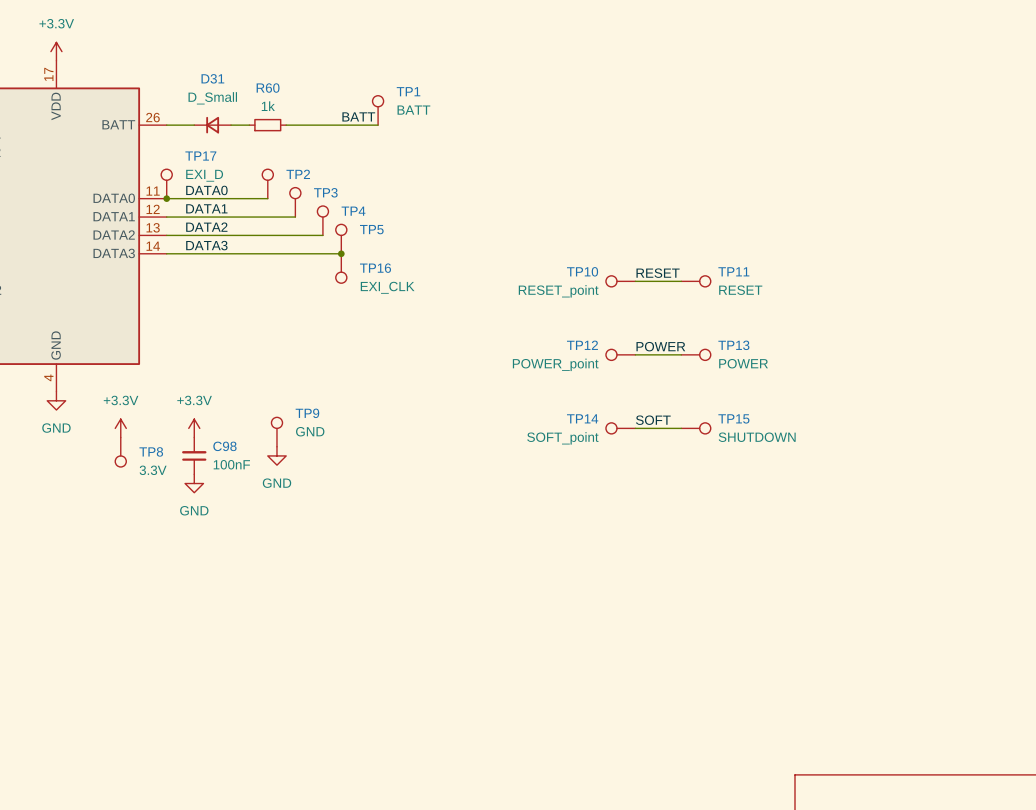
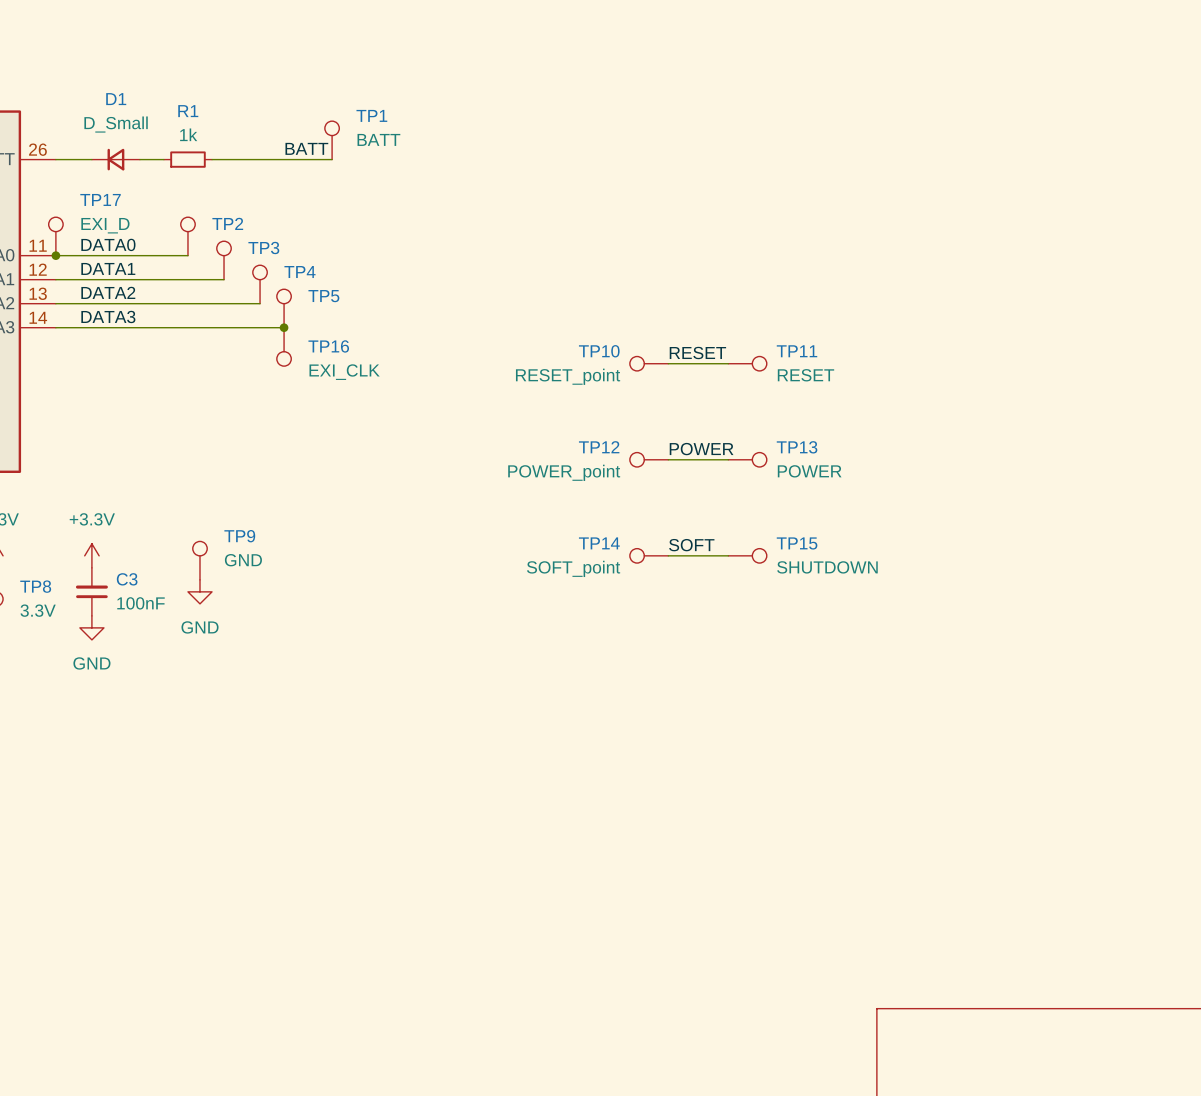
D31 name: D31 (212, 78) -> D1 (116, 99)
R60 name: R60 (268, 88) -> R1 (188, 111)
C98 name: C98 (224, 446) -> C3 (127, 579)

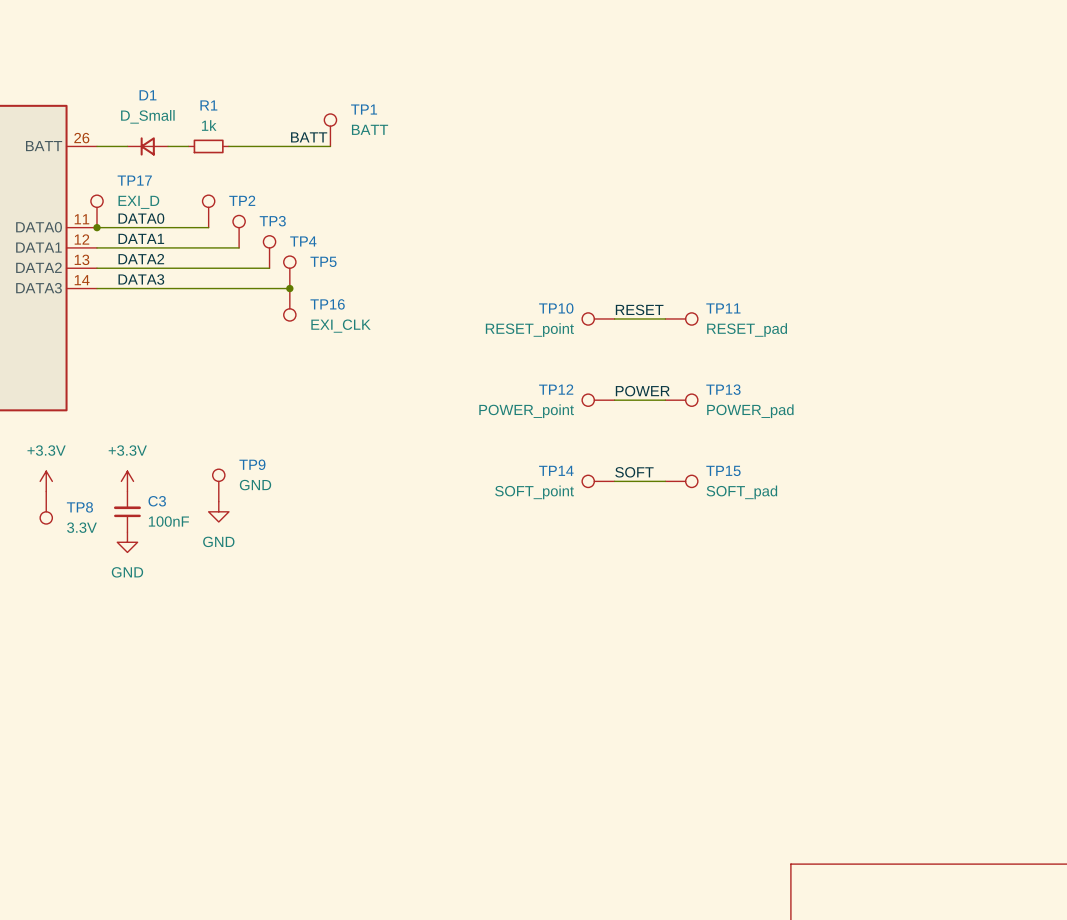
TP11 value: RESET (805, 375) -> RESET_pad (747, 330)
TP13 value: POWER (809, 471) -> POWER_pad (750, 411)
TP15 value: SHUTDOWN (827, 567) -> SOFT_pad (741, 492)

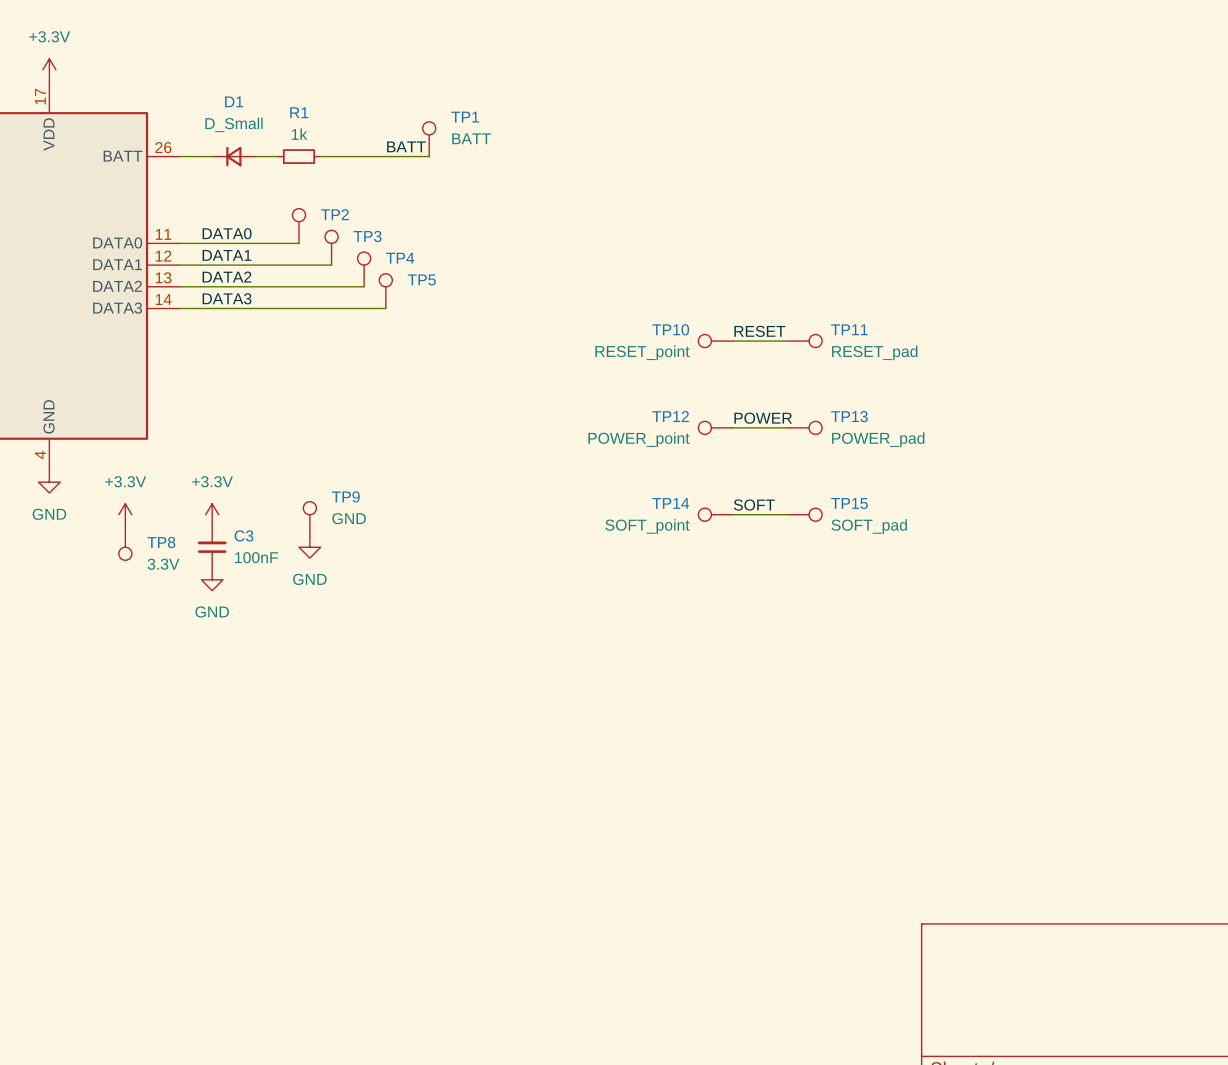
TP17: EXI_D (97, 211) -> none
junction: (97, 227) -> none
junction: (289, 288) -> none
TP16: EXI_CLK (289, 304) -> none

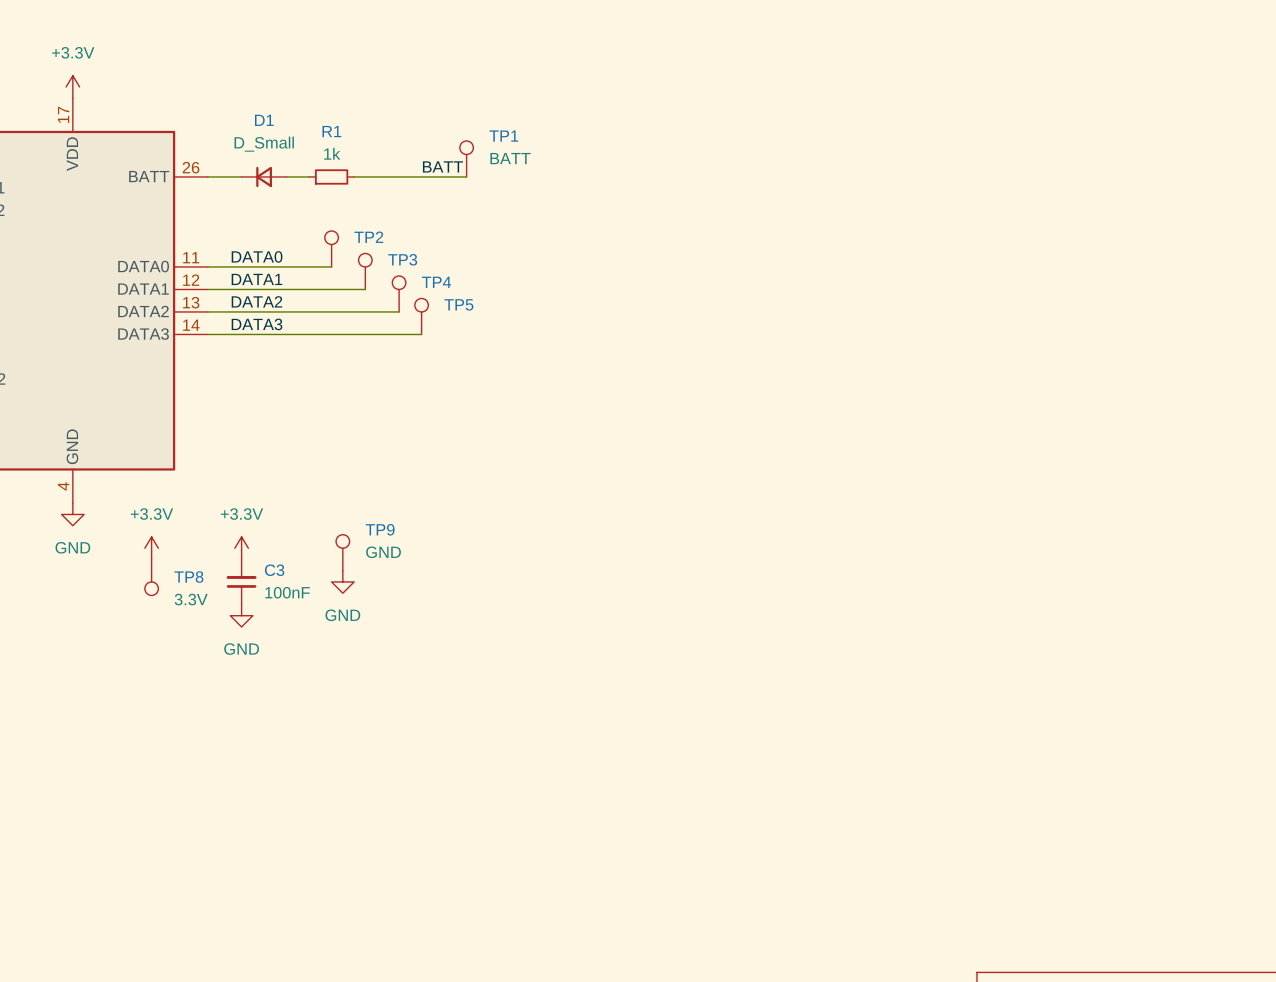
label: RESET (759, 331) -> none
TP10: RESET_point (715, 341) -> none
wire: (733, 341) (787, 341) -> none
TP11: RESET_pad (804, 341) -> none
label: POWER (763, 418) -> none
TP12: POWER_point (715, 427) -> none
wire: (733, 427) (787, 427) -> none
TP13: POWER_pad (804, 427) -> none
label: SOFT (754, 505) -> none
TP14: SOFT_point (715, 514) -> none
wire: (733, 514) (787, 514) -> none
TP15: SOFT_pad (804, 514) -> none

